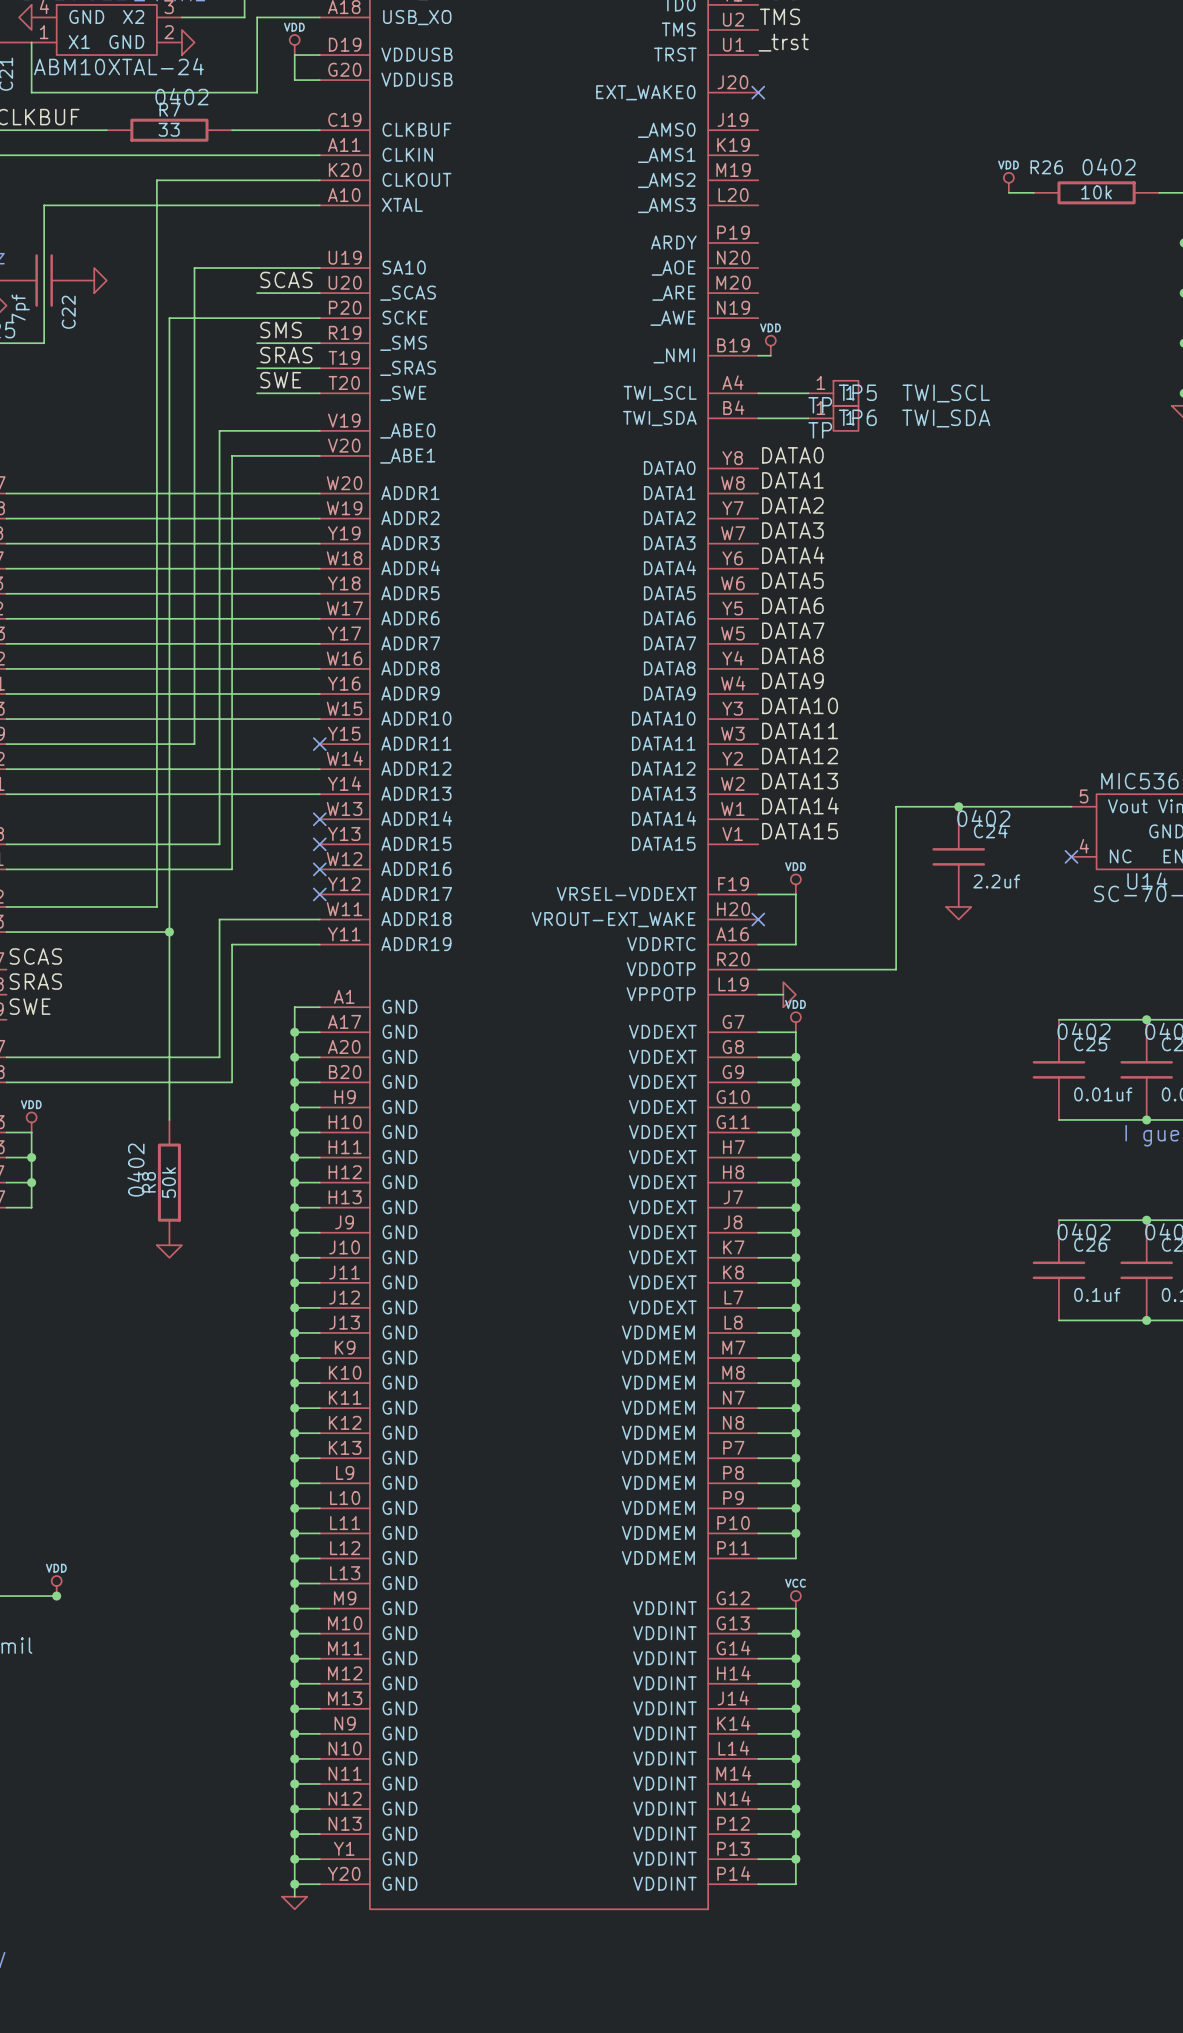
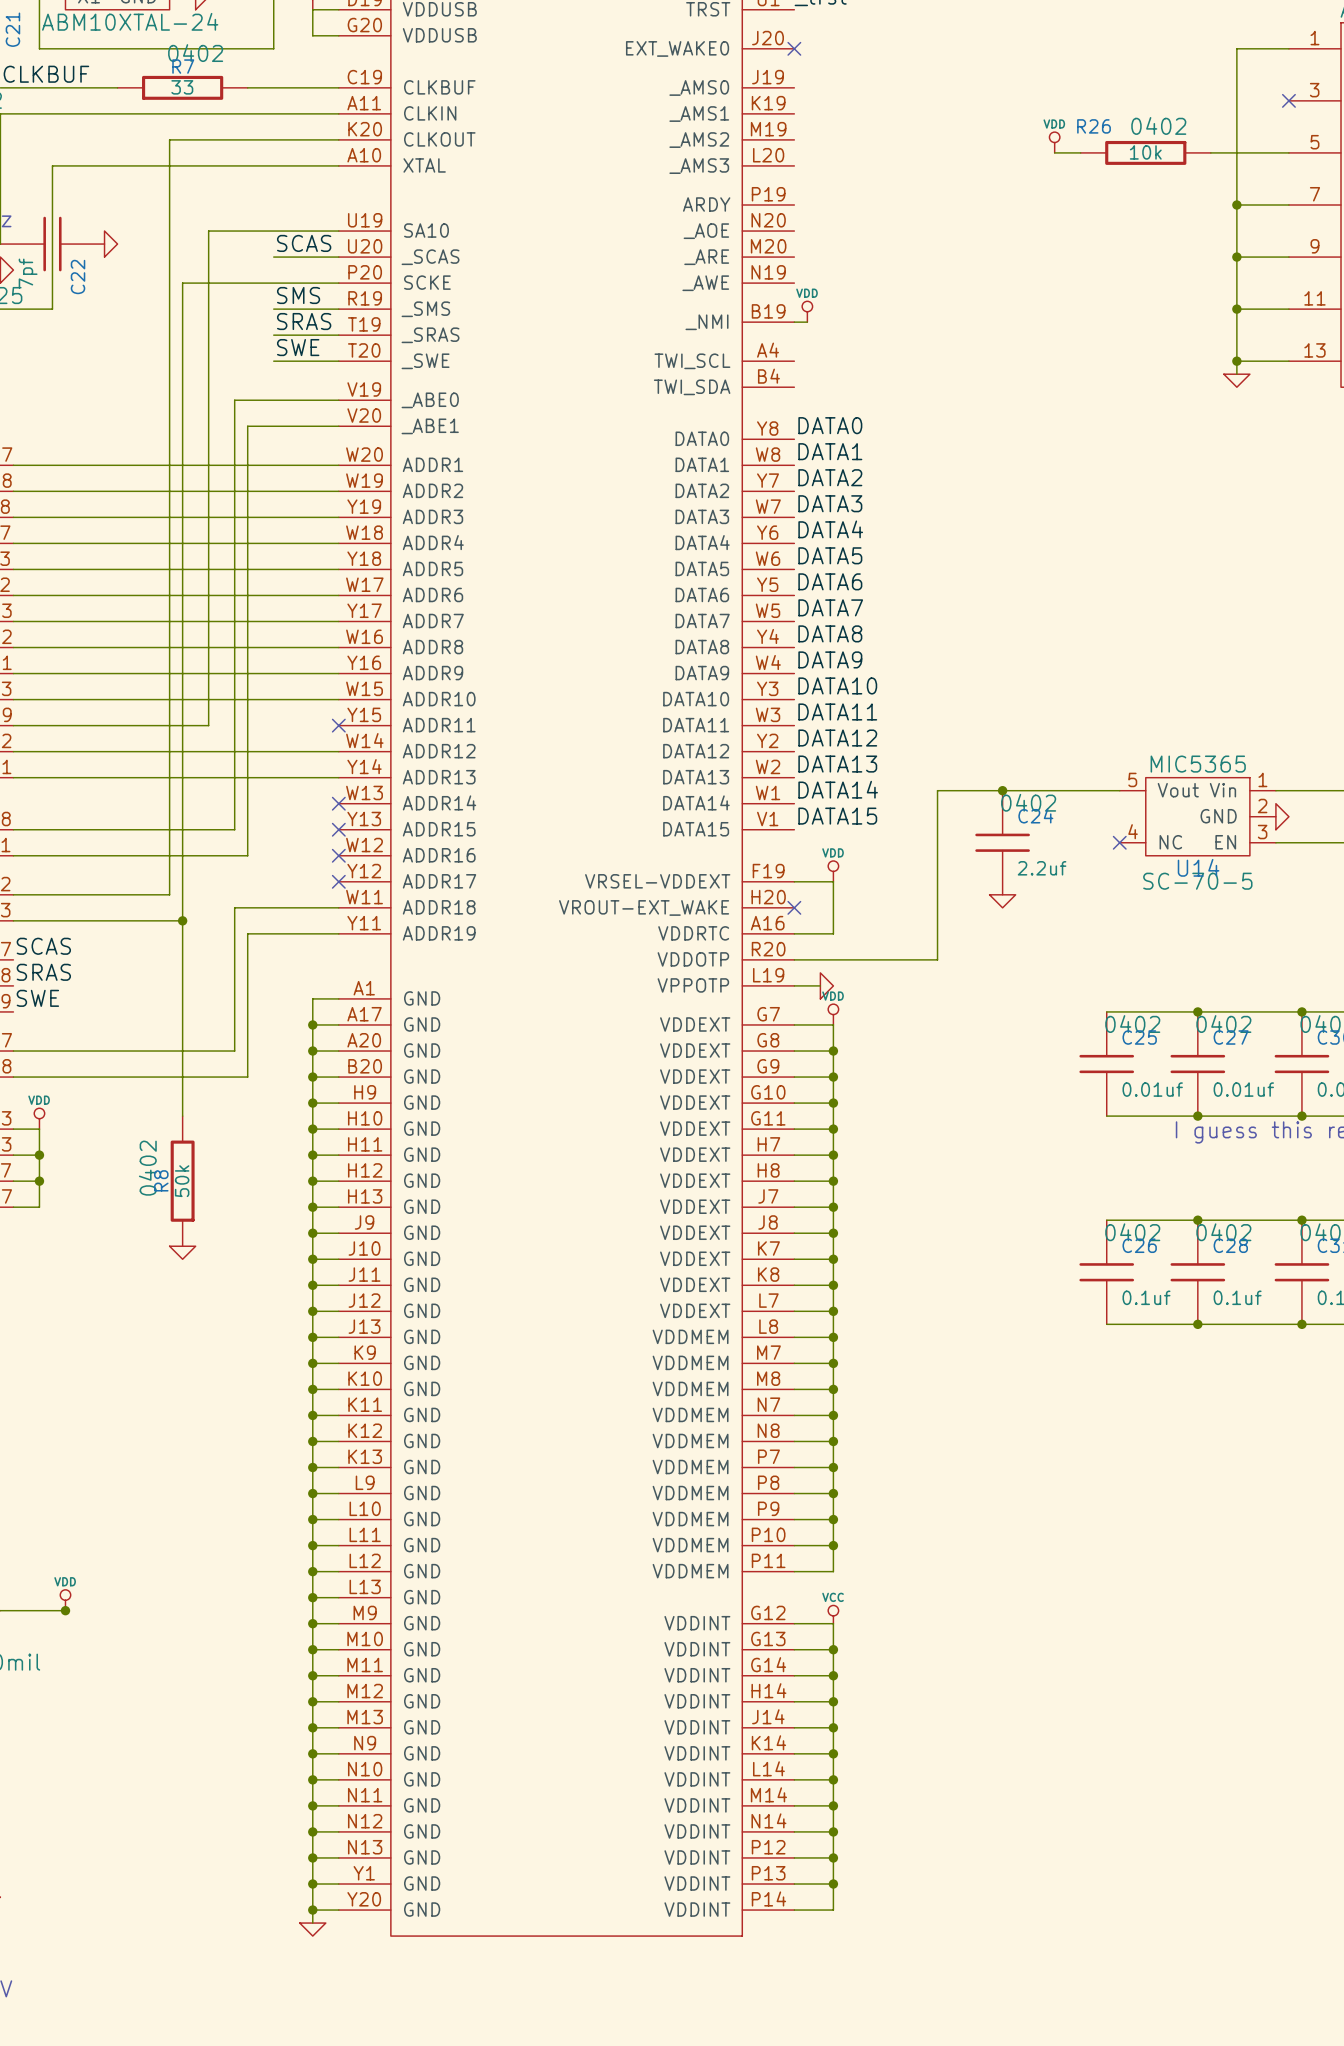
wire: (758, 393) (808, 393) -> none
TP5: TWI_SCL (833, 393) -> none
wire: (758, 418) (808, 418) -> none
TP6: TWI_SDA (833, 418) -> none

